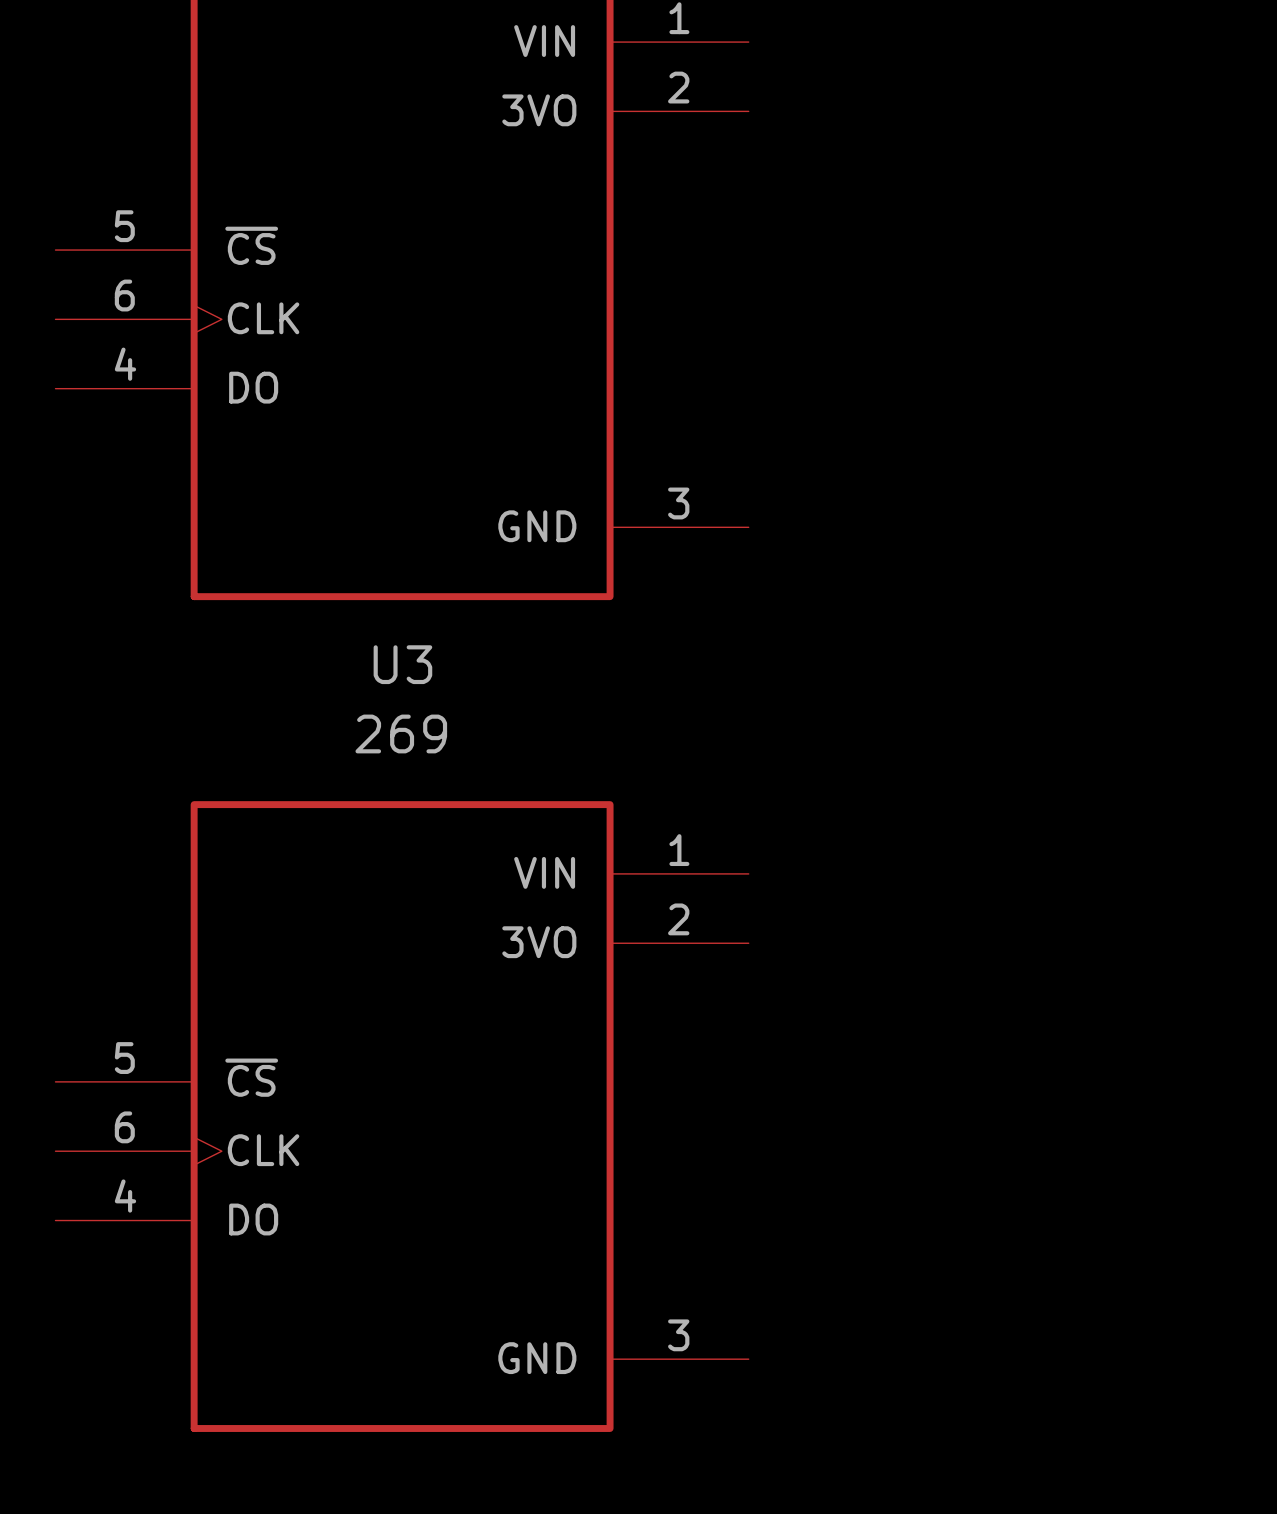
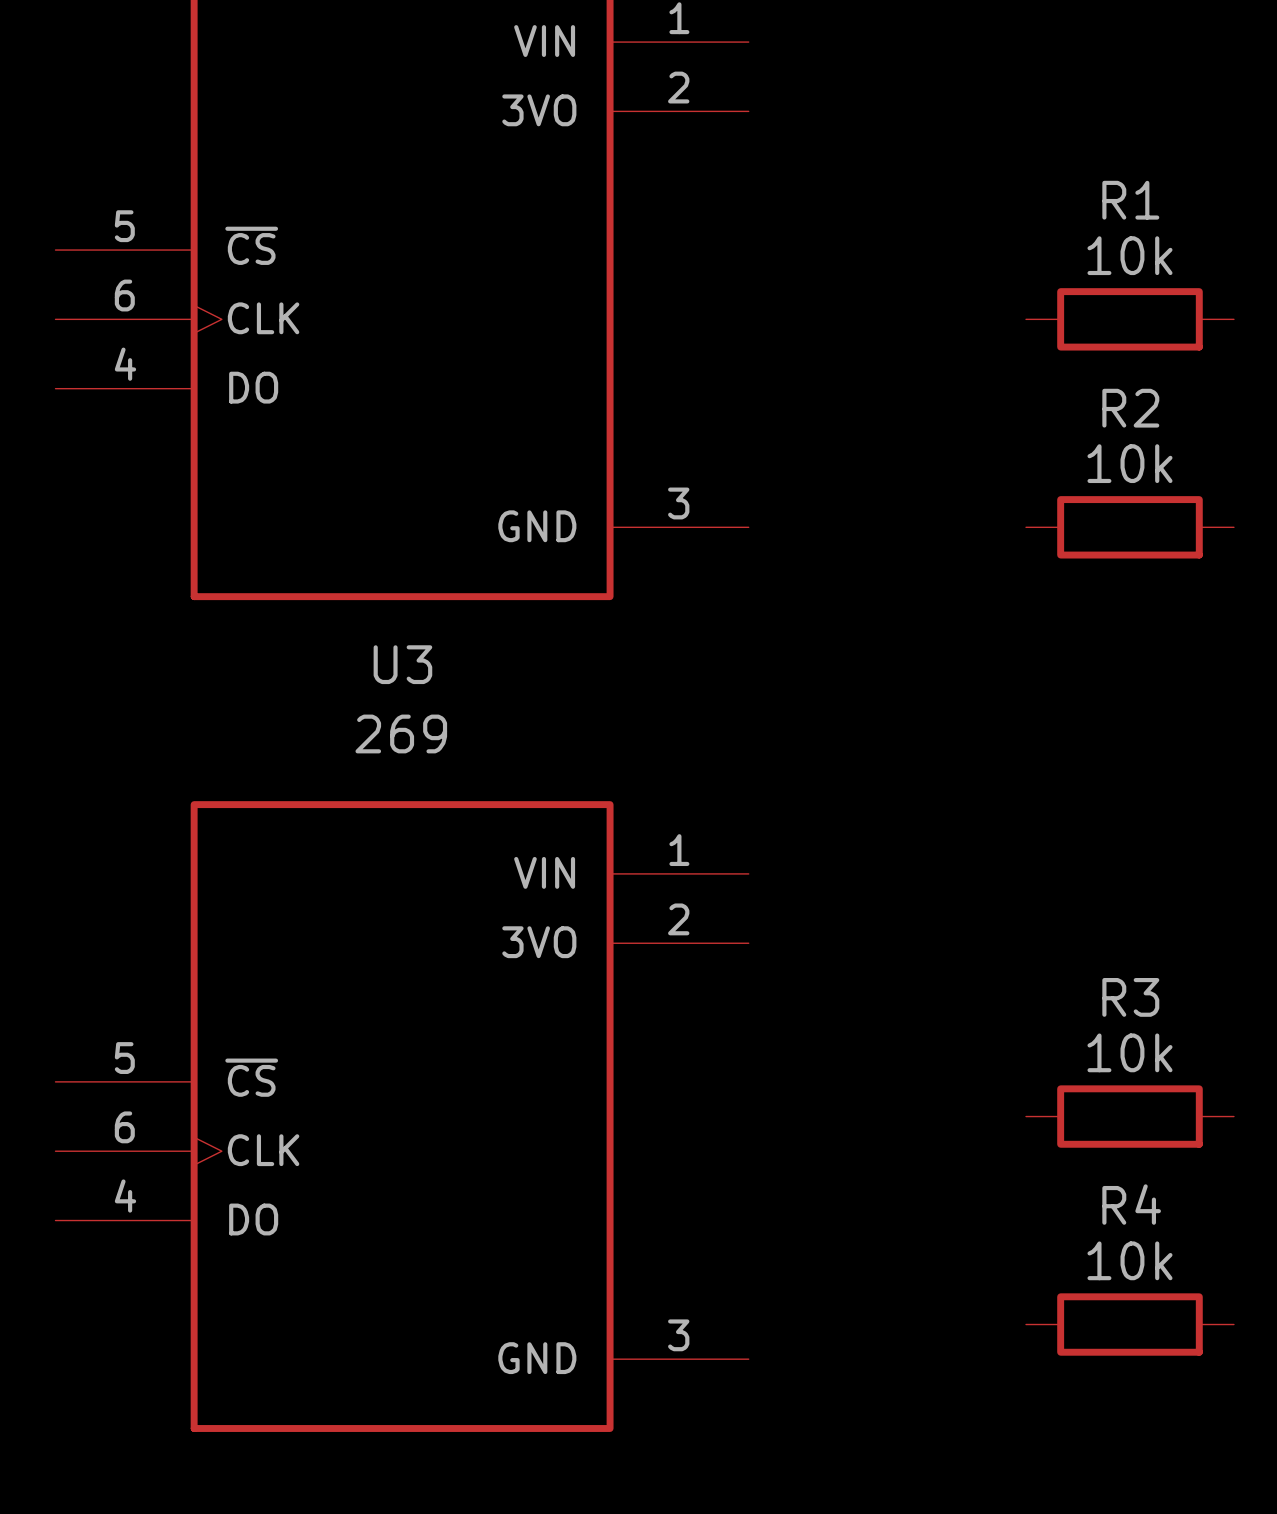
R1: none -> 10k (1129, 319)
R2: none -> 10k (1129, 527)
R3: none -> 10k (1129, 1116)
R4: none -> 10k (1129, 1324)

